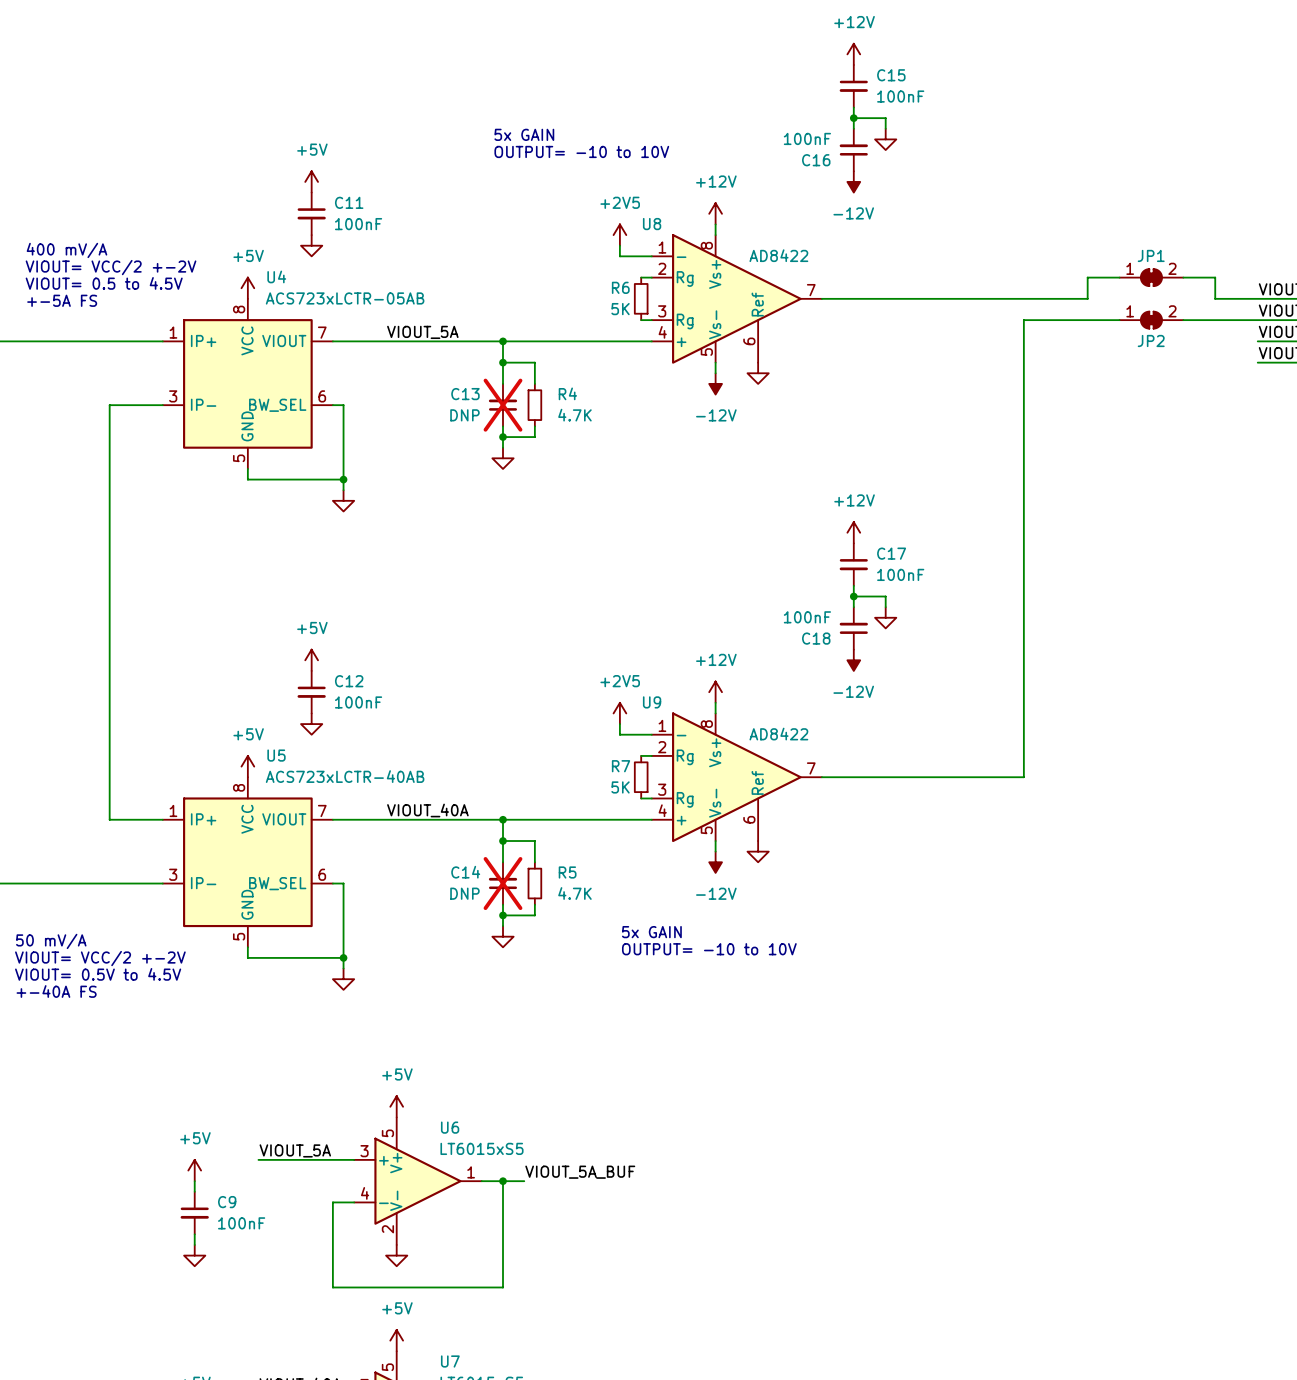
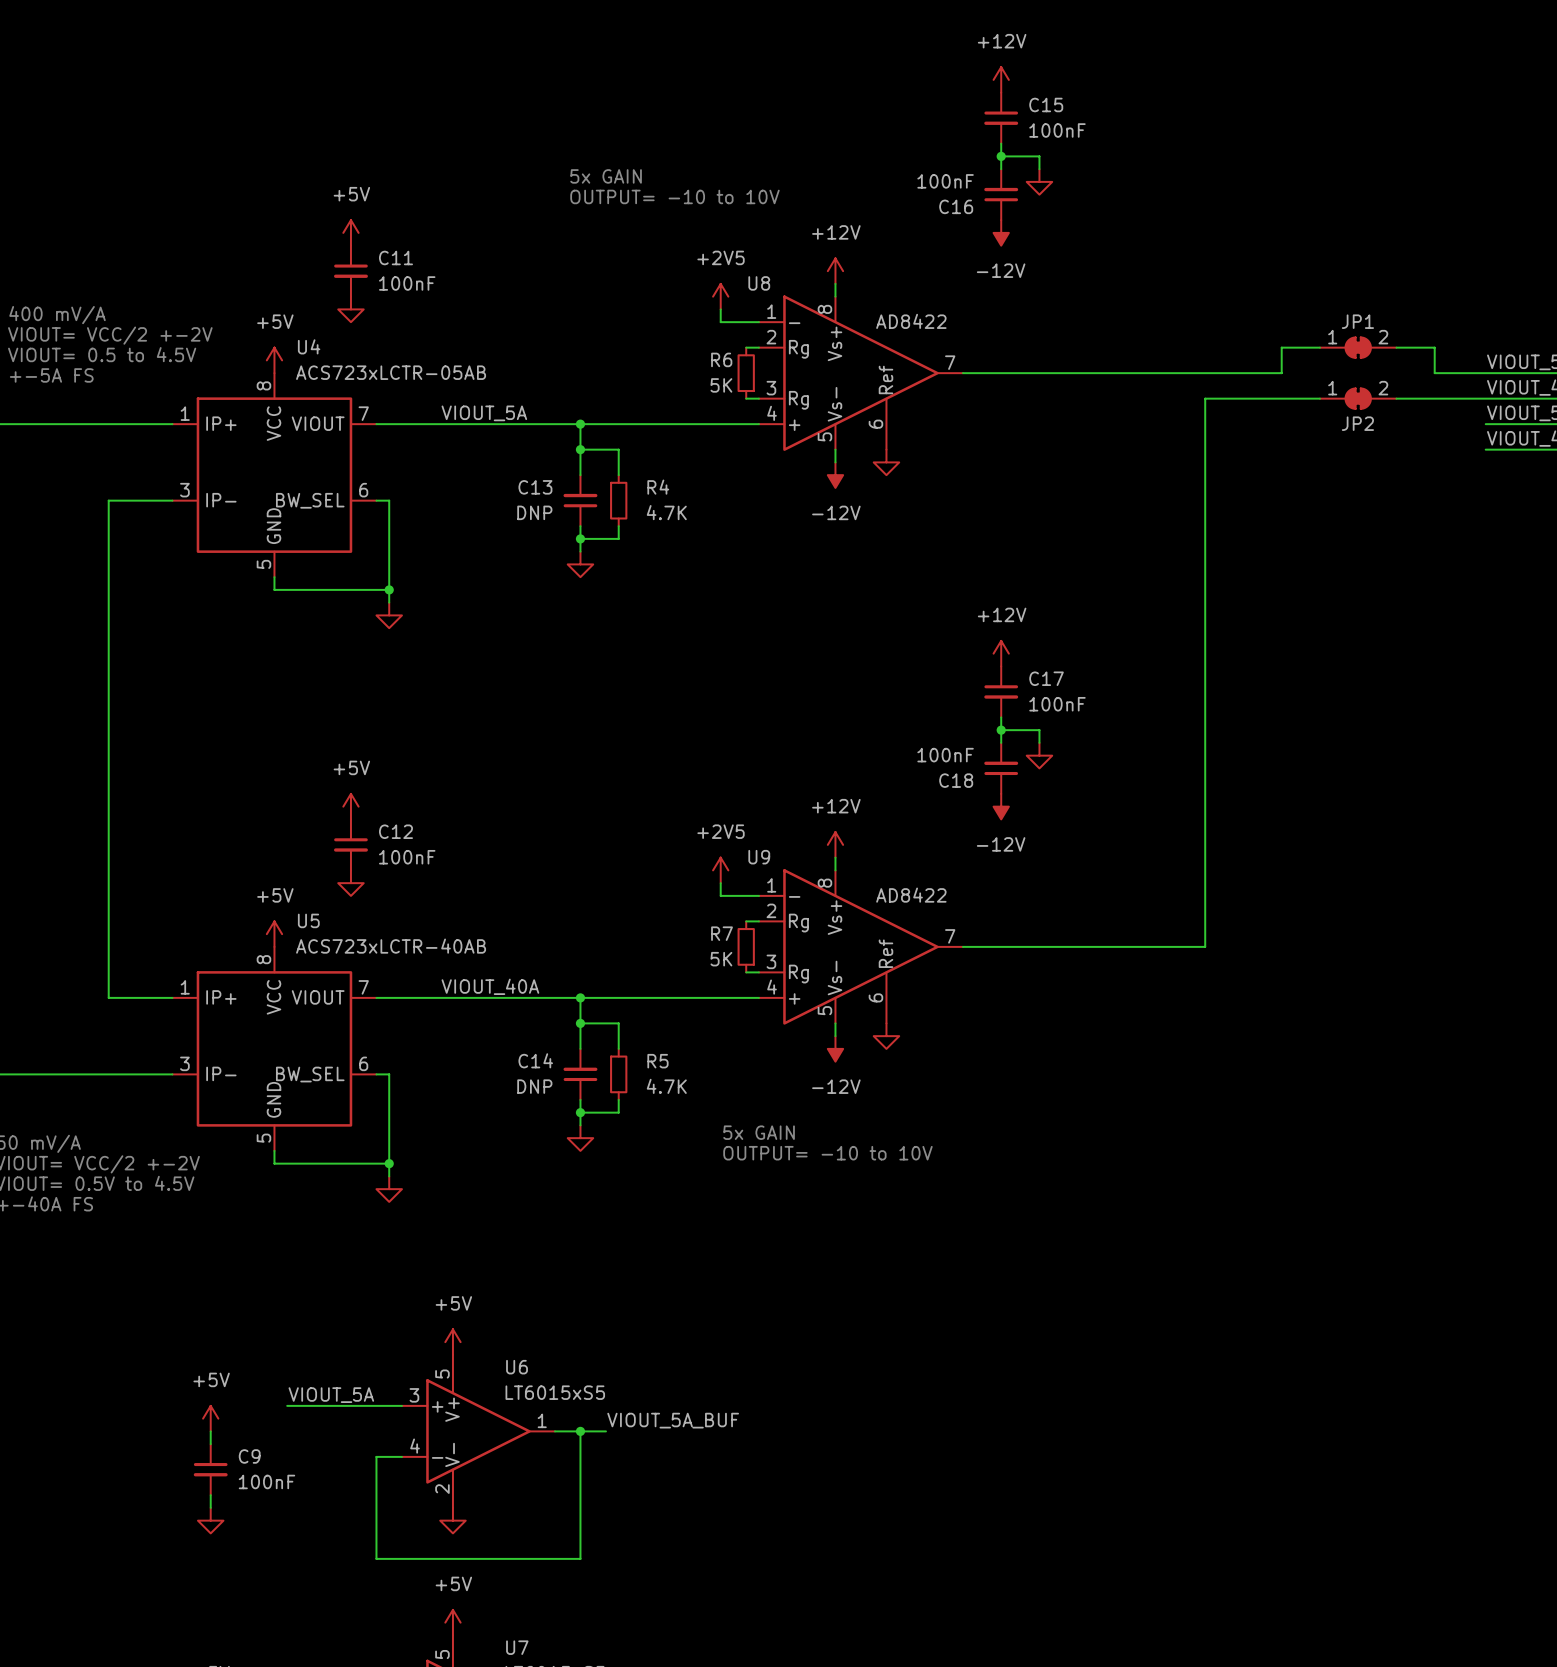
C13 do-not-place cross: (503, 405) -> none
C14 do-not-place cross: (503, 883) -> none

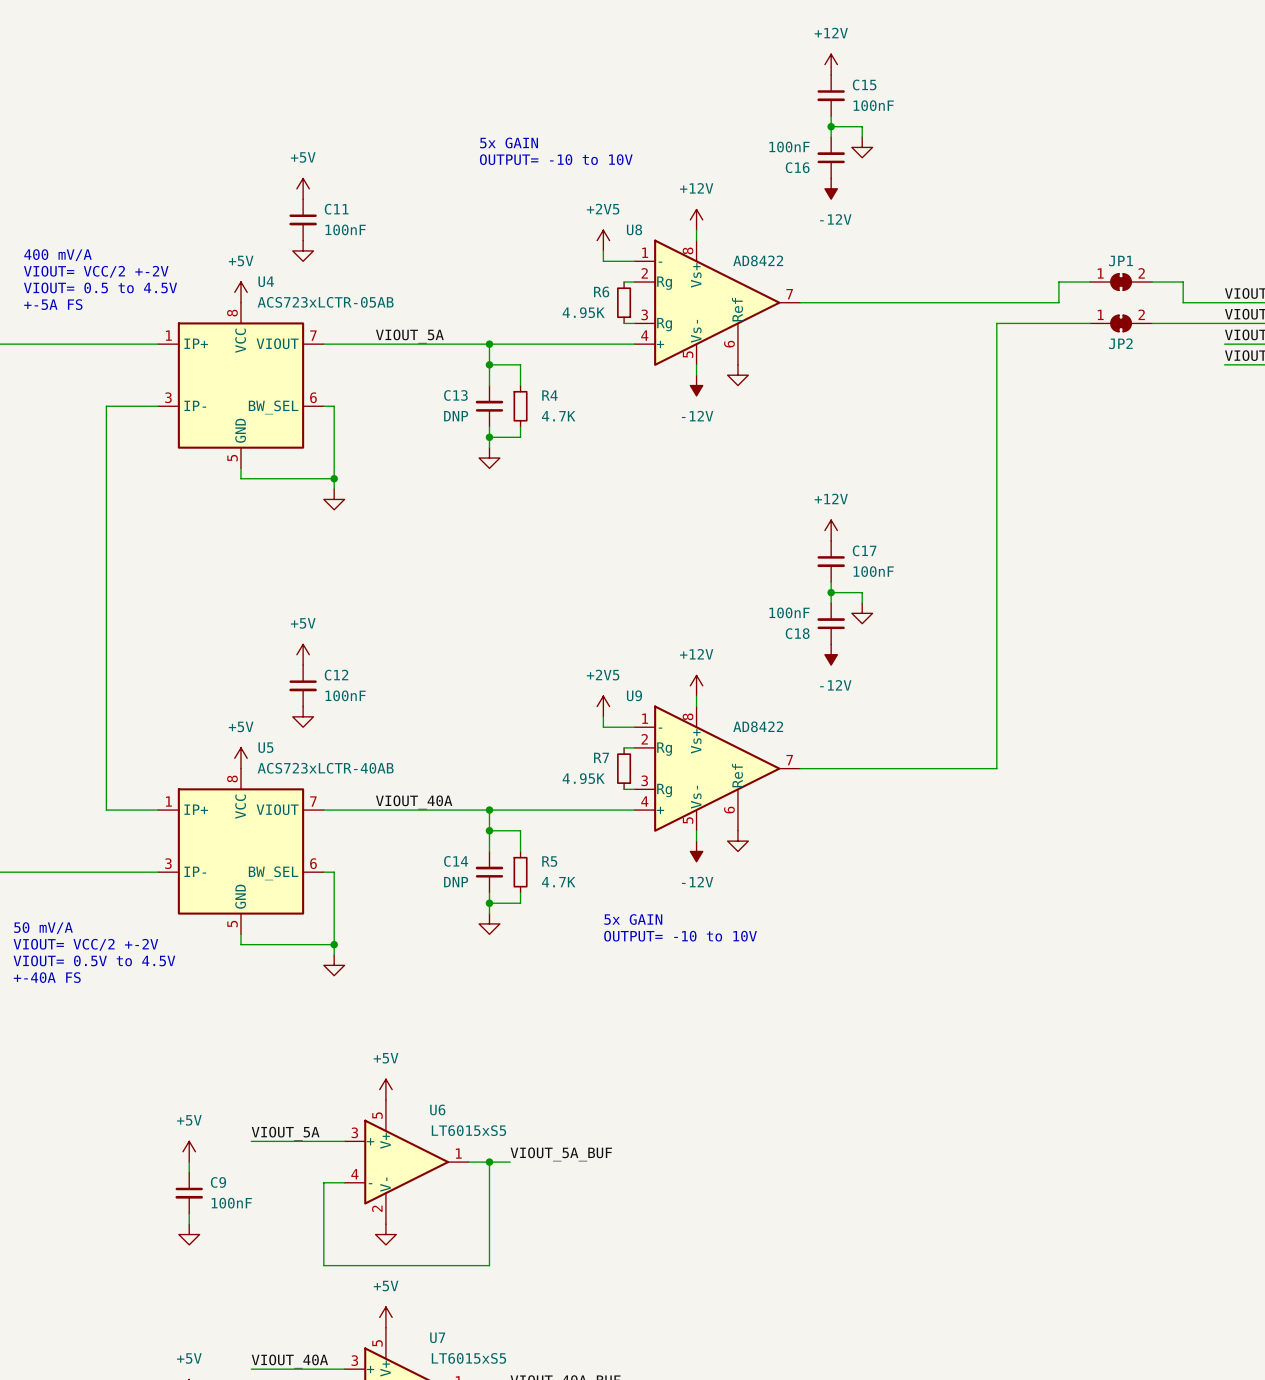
R6 value: 5K (721, 385) -> 4.95K (583, 312)
R7 value: 5K (721, 959) -> 4.95K (583, 778)

